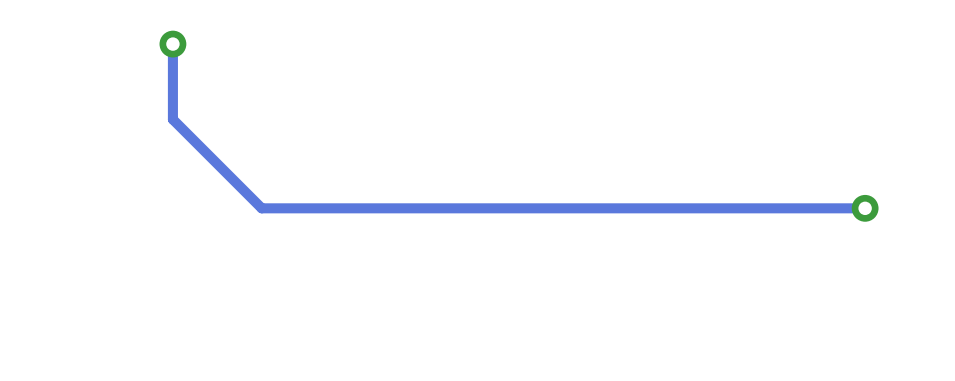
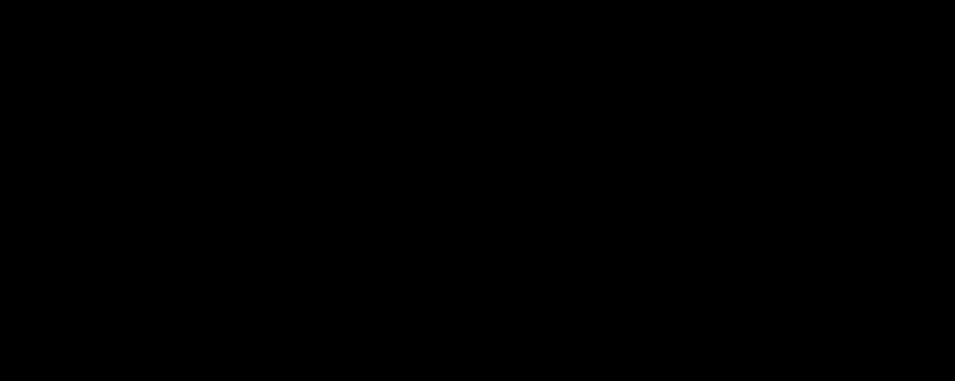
track: (172, 44) (172, 119) (261, 208) (865, 208) -> none
via: (172, 44) -> none
via: (865, 208) -> none

